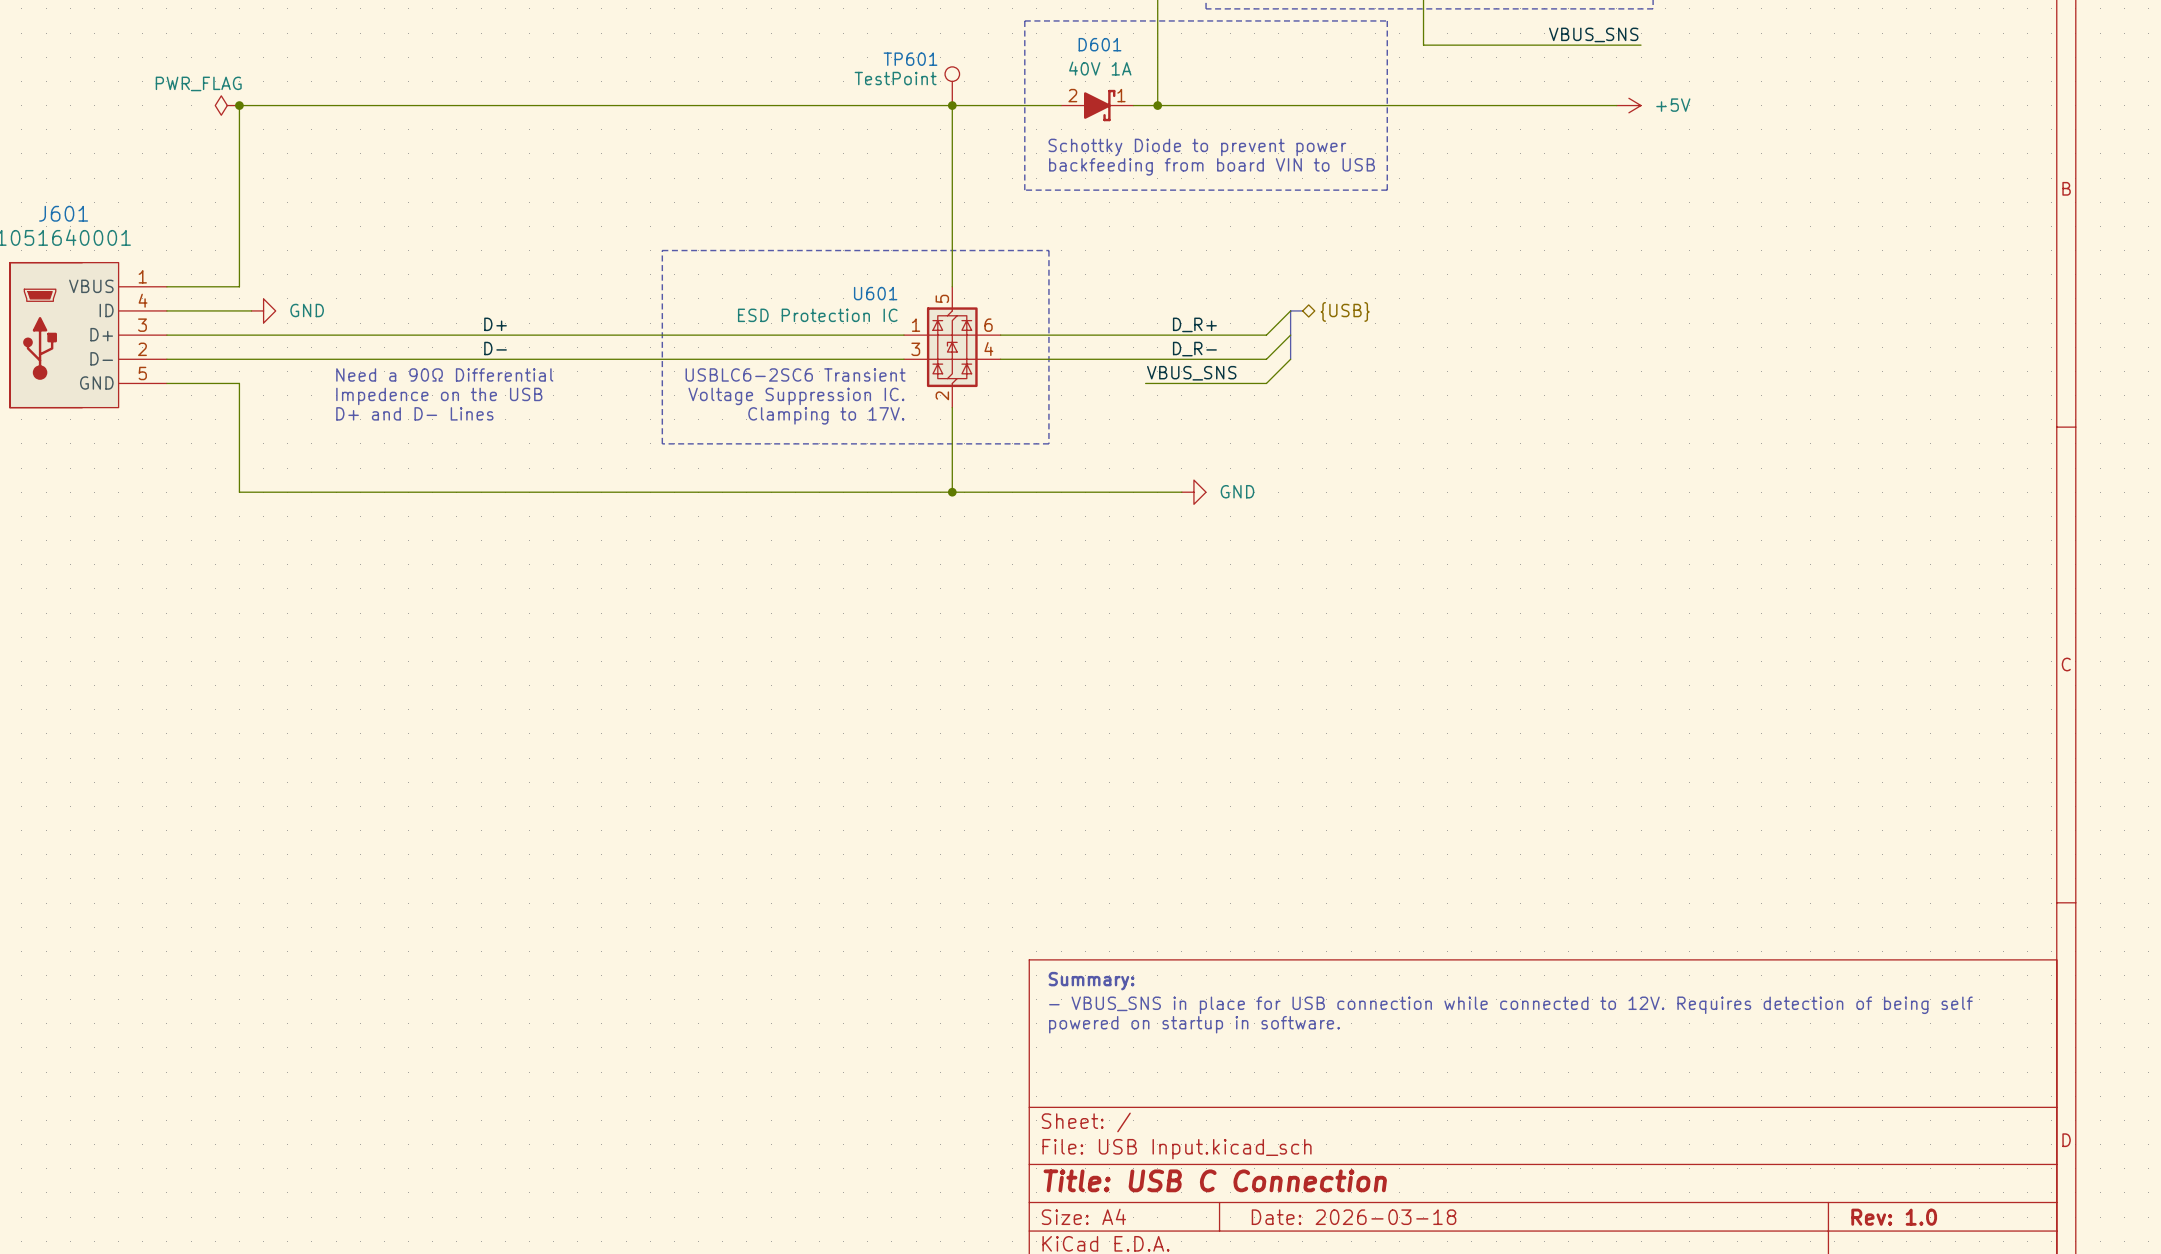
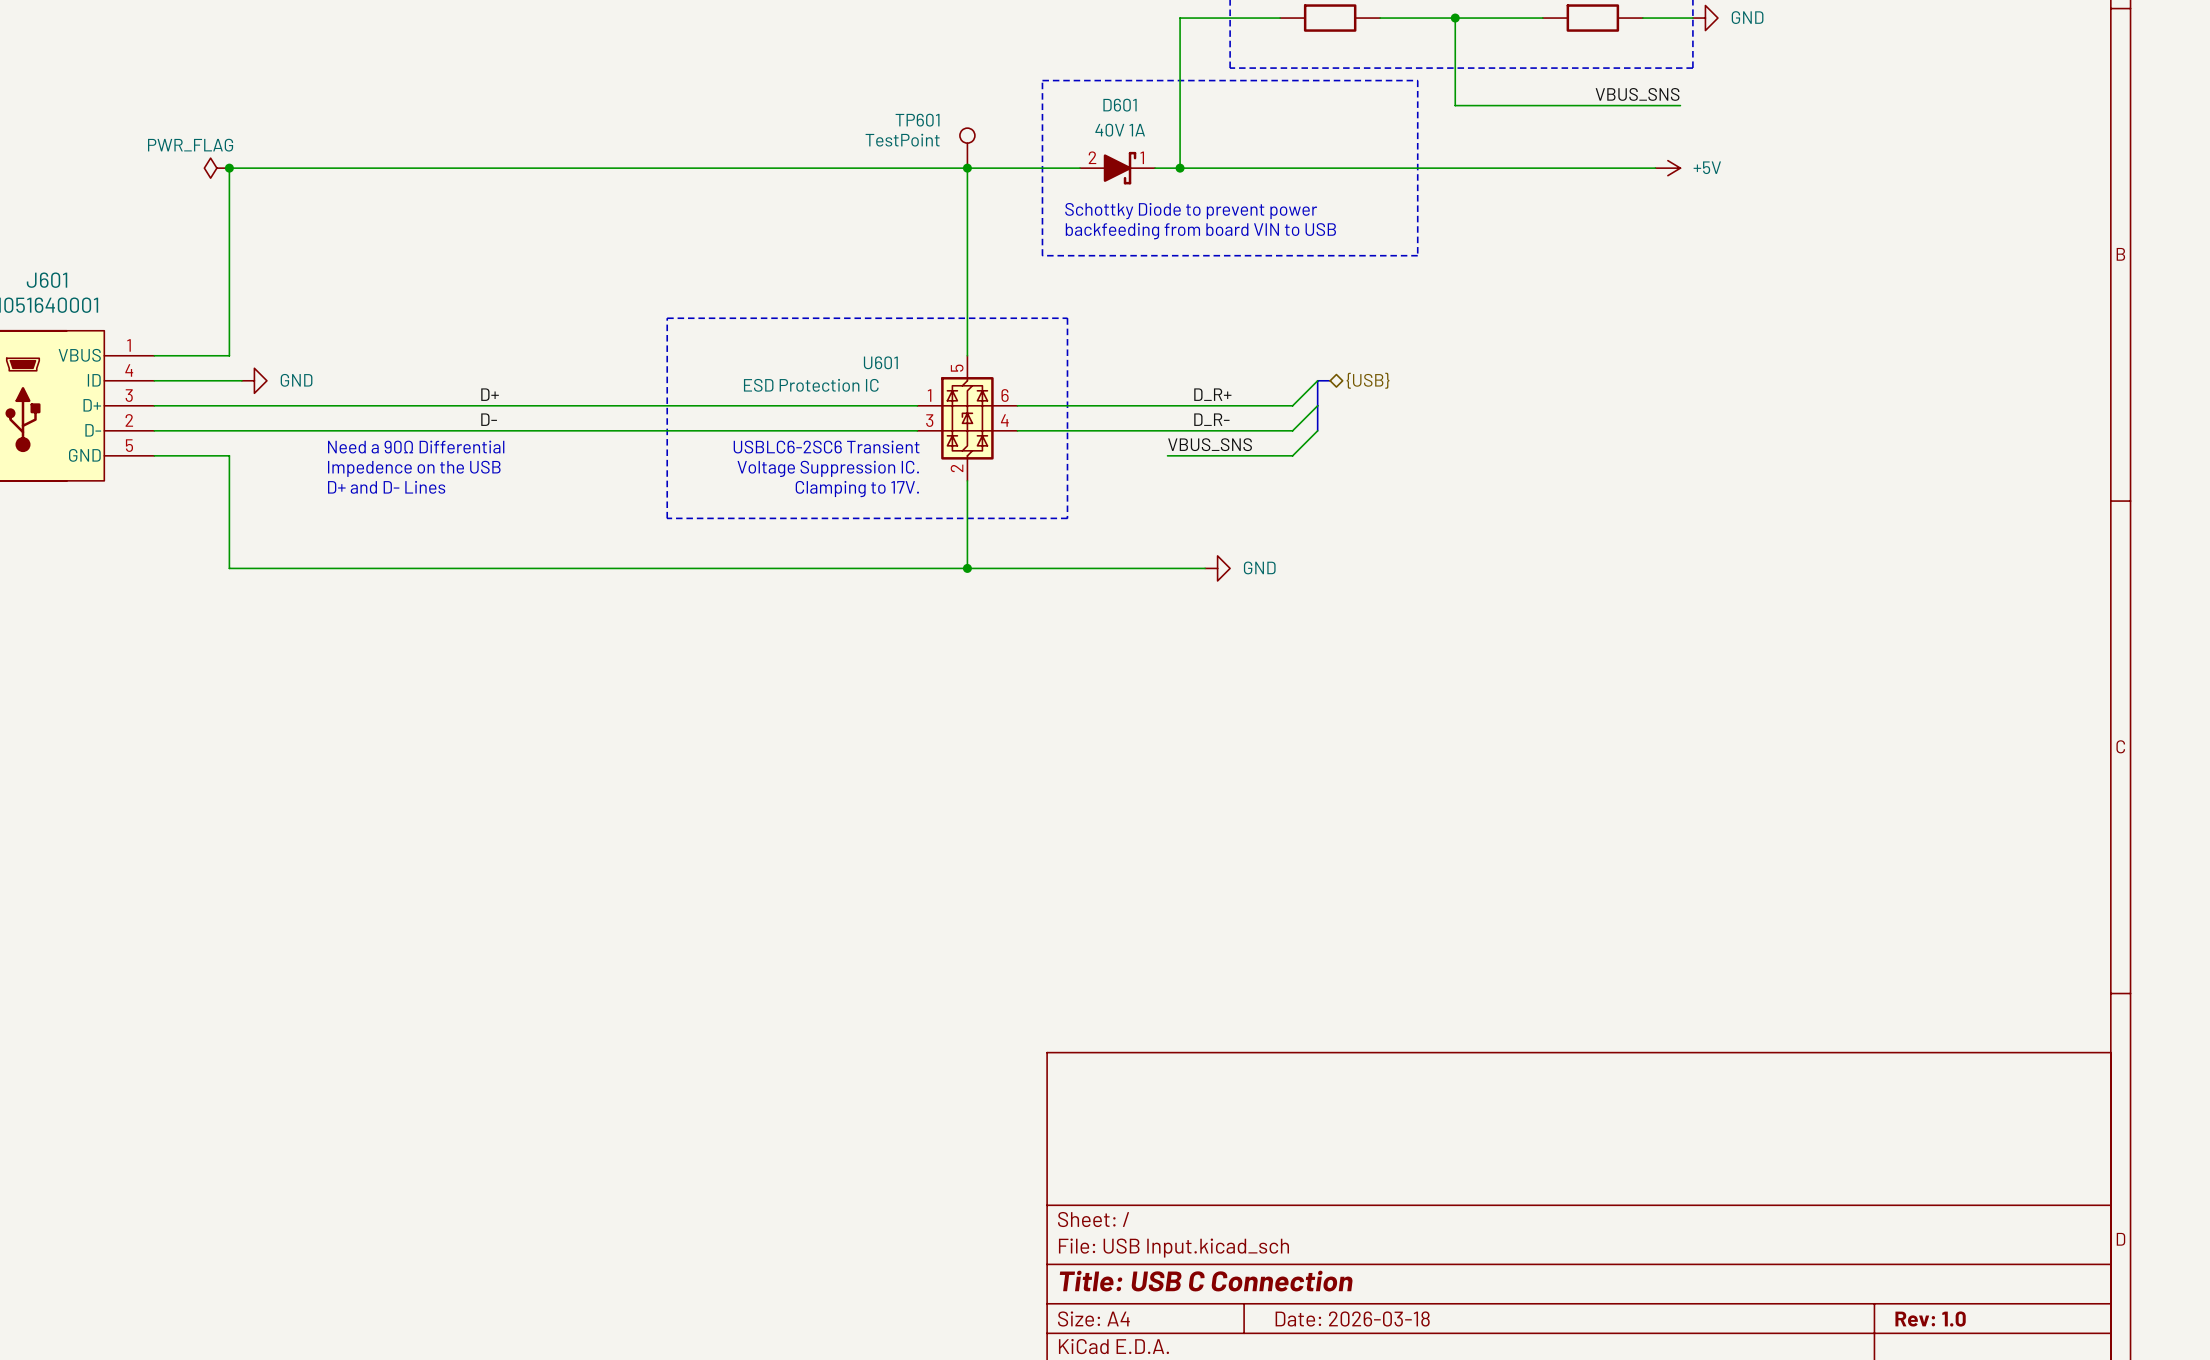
text: Summary: (1091, 981) -> none
text: - VBUS_SNS in place for USB connection while connected to 12V. Requires detection of being self (1510, 1005) -> none
text: powered on startup in software. (1194, 1024) -> none

